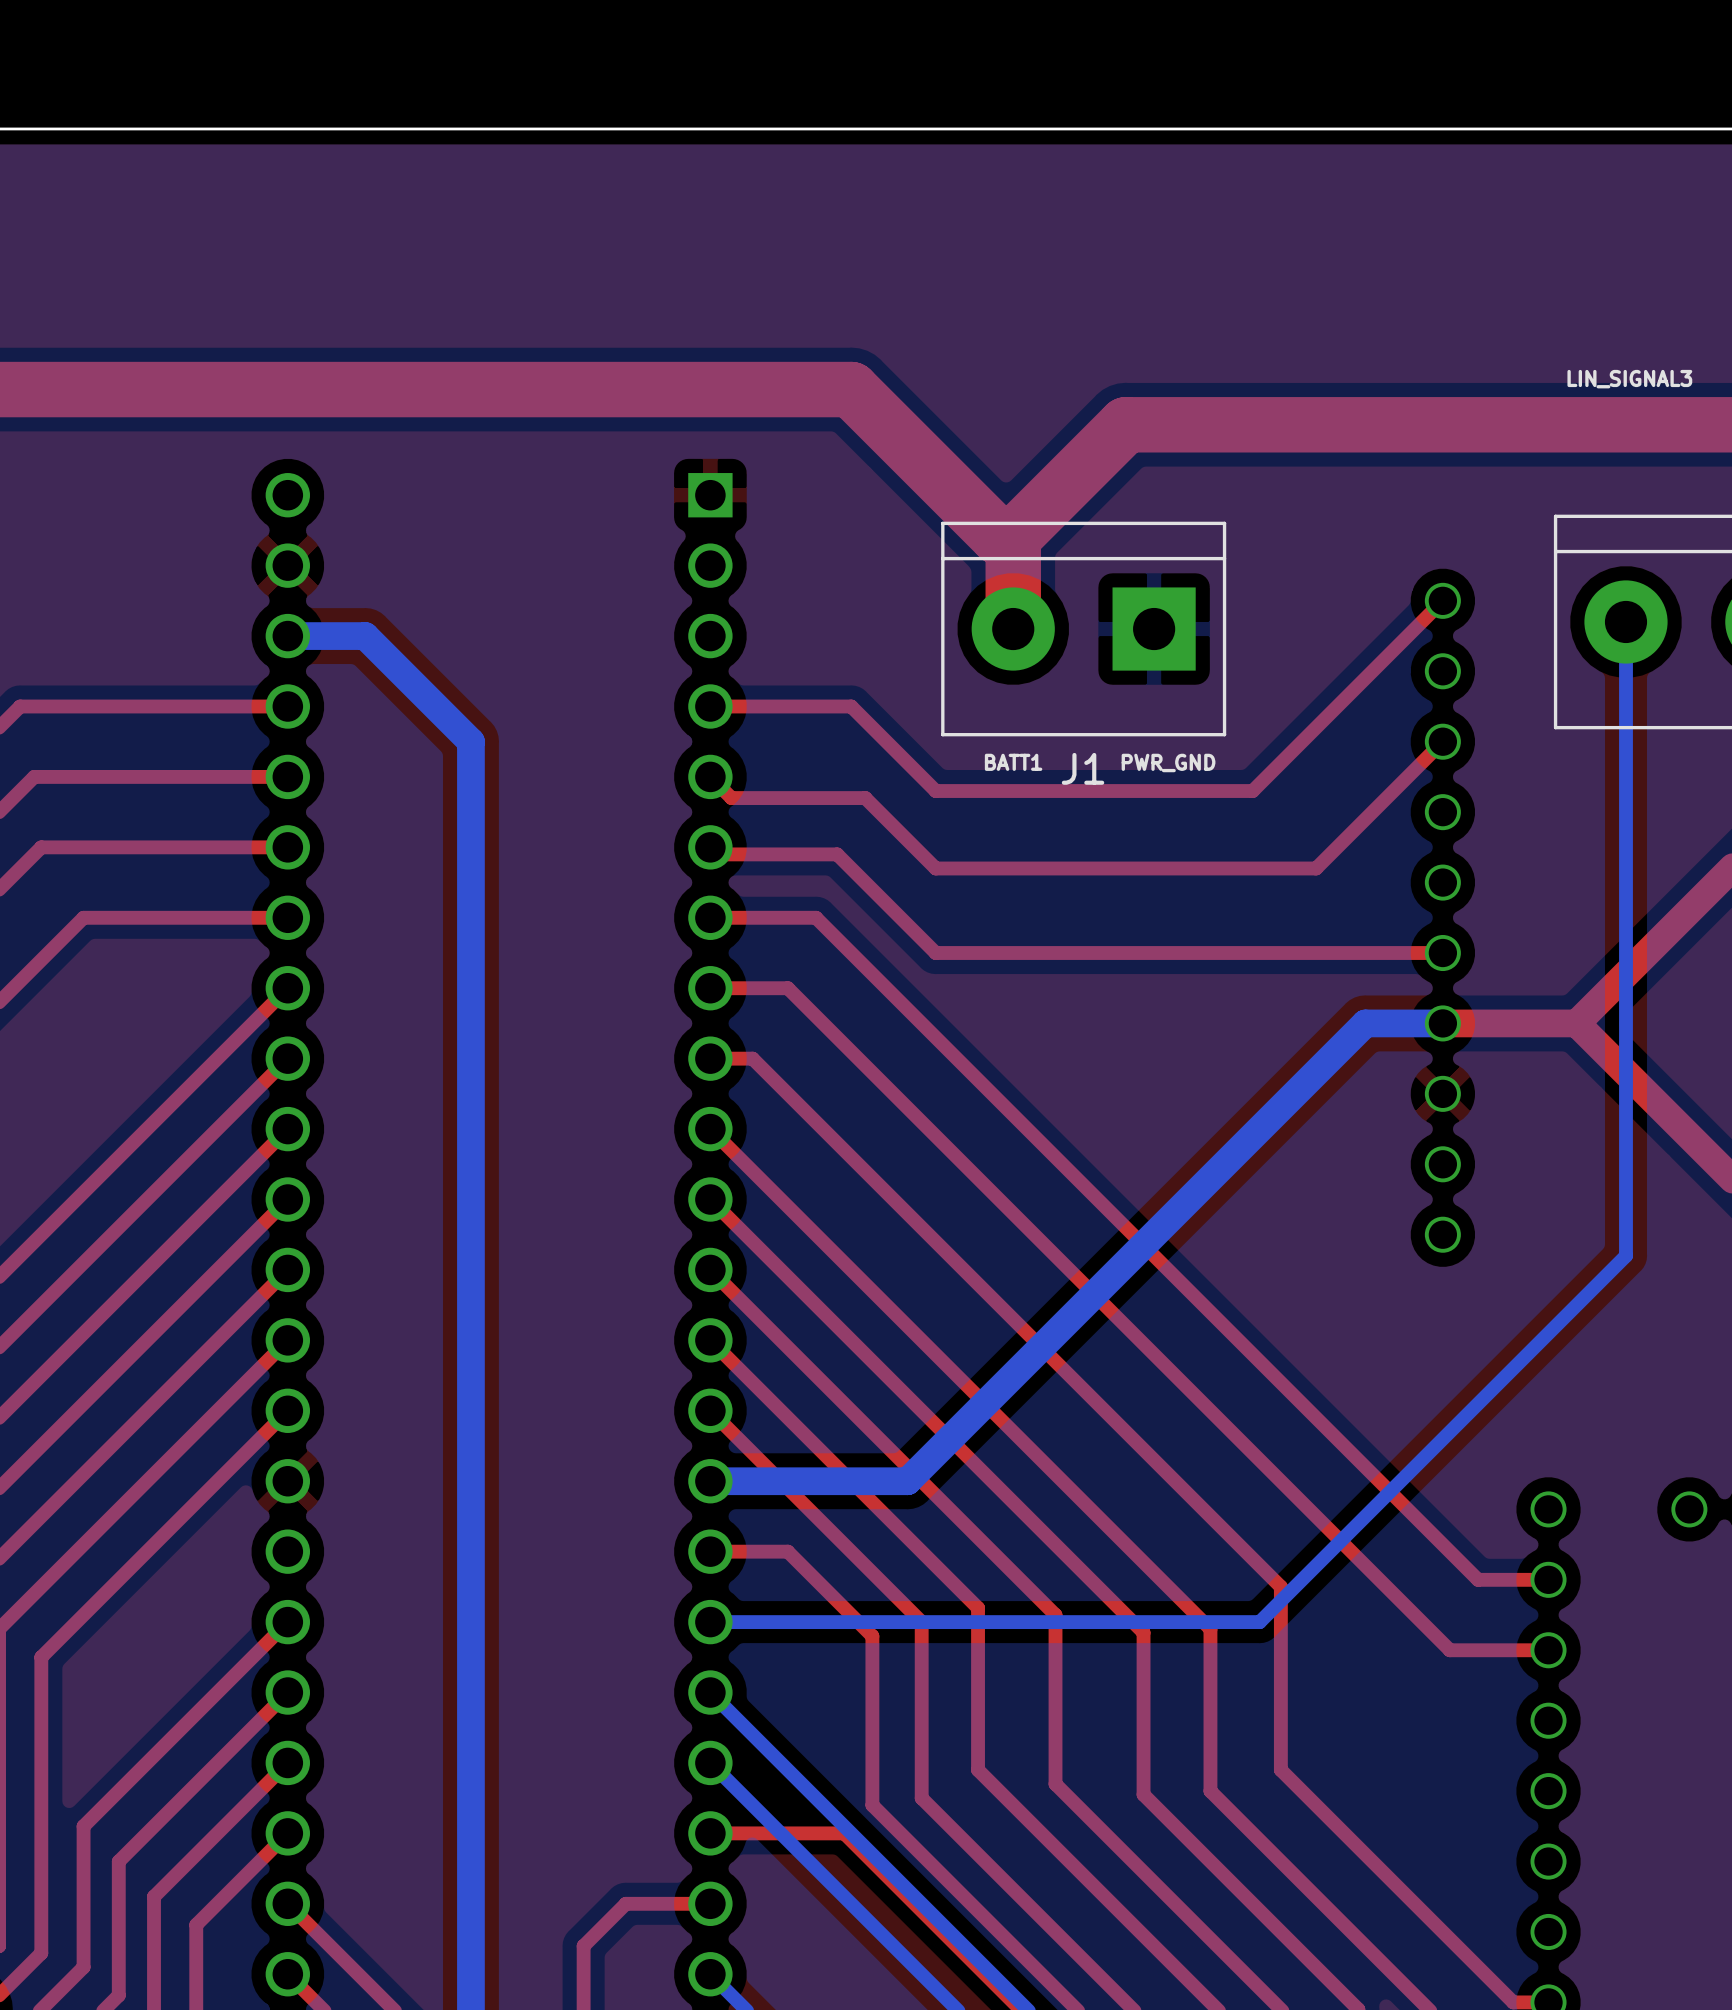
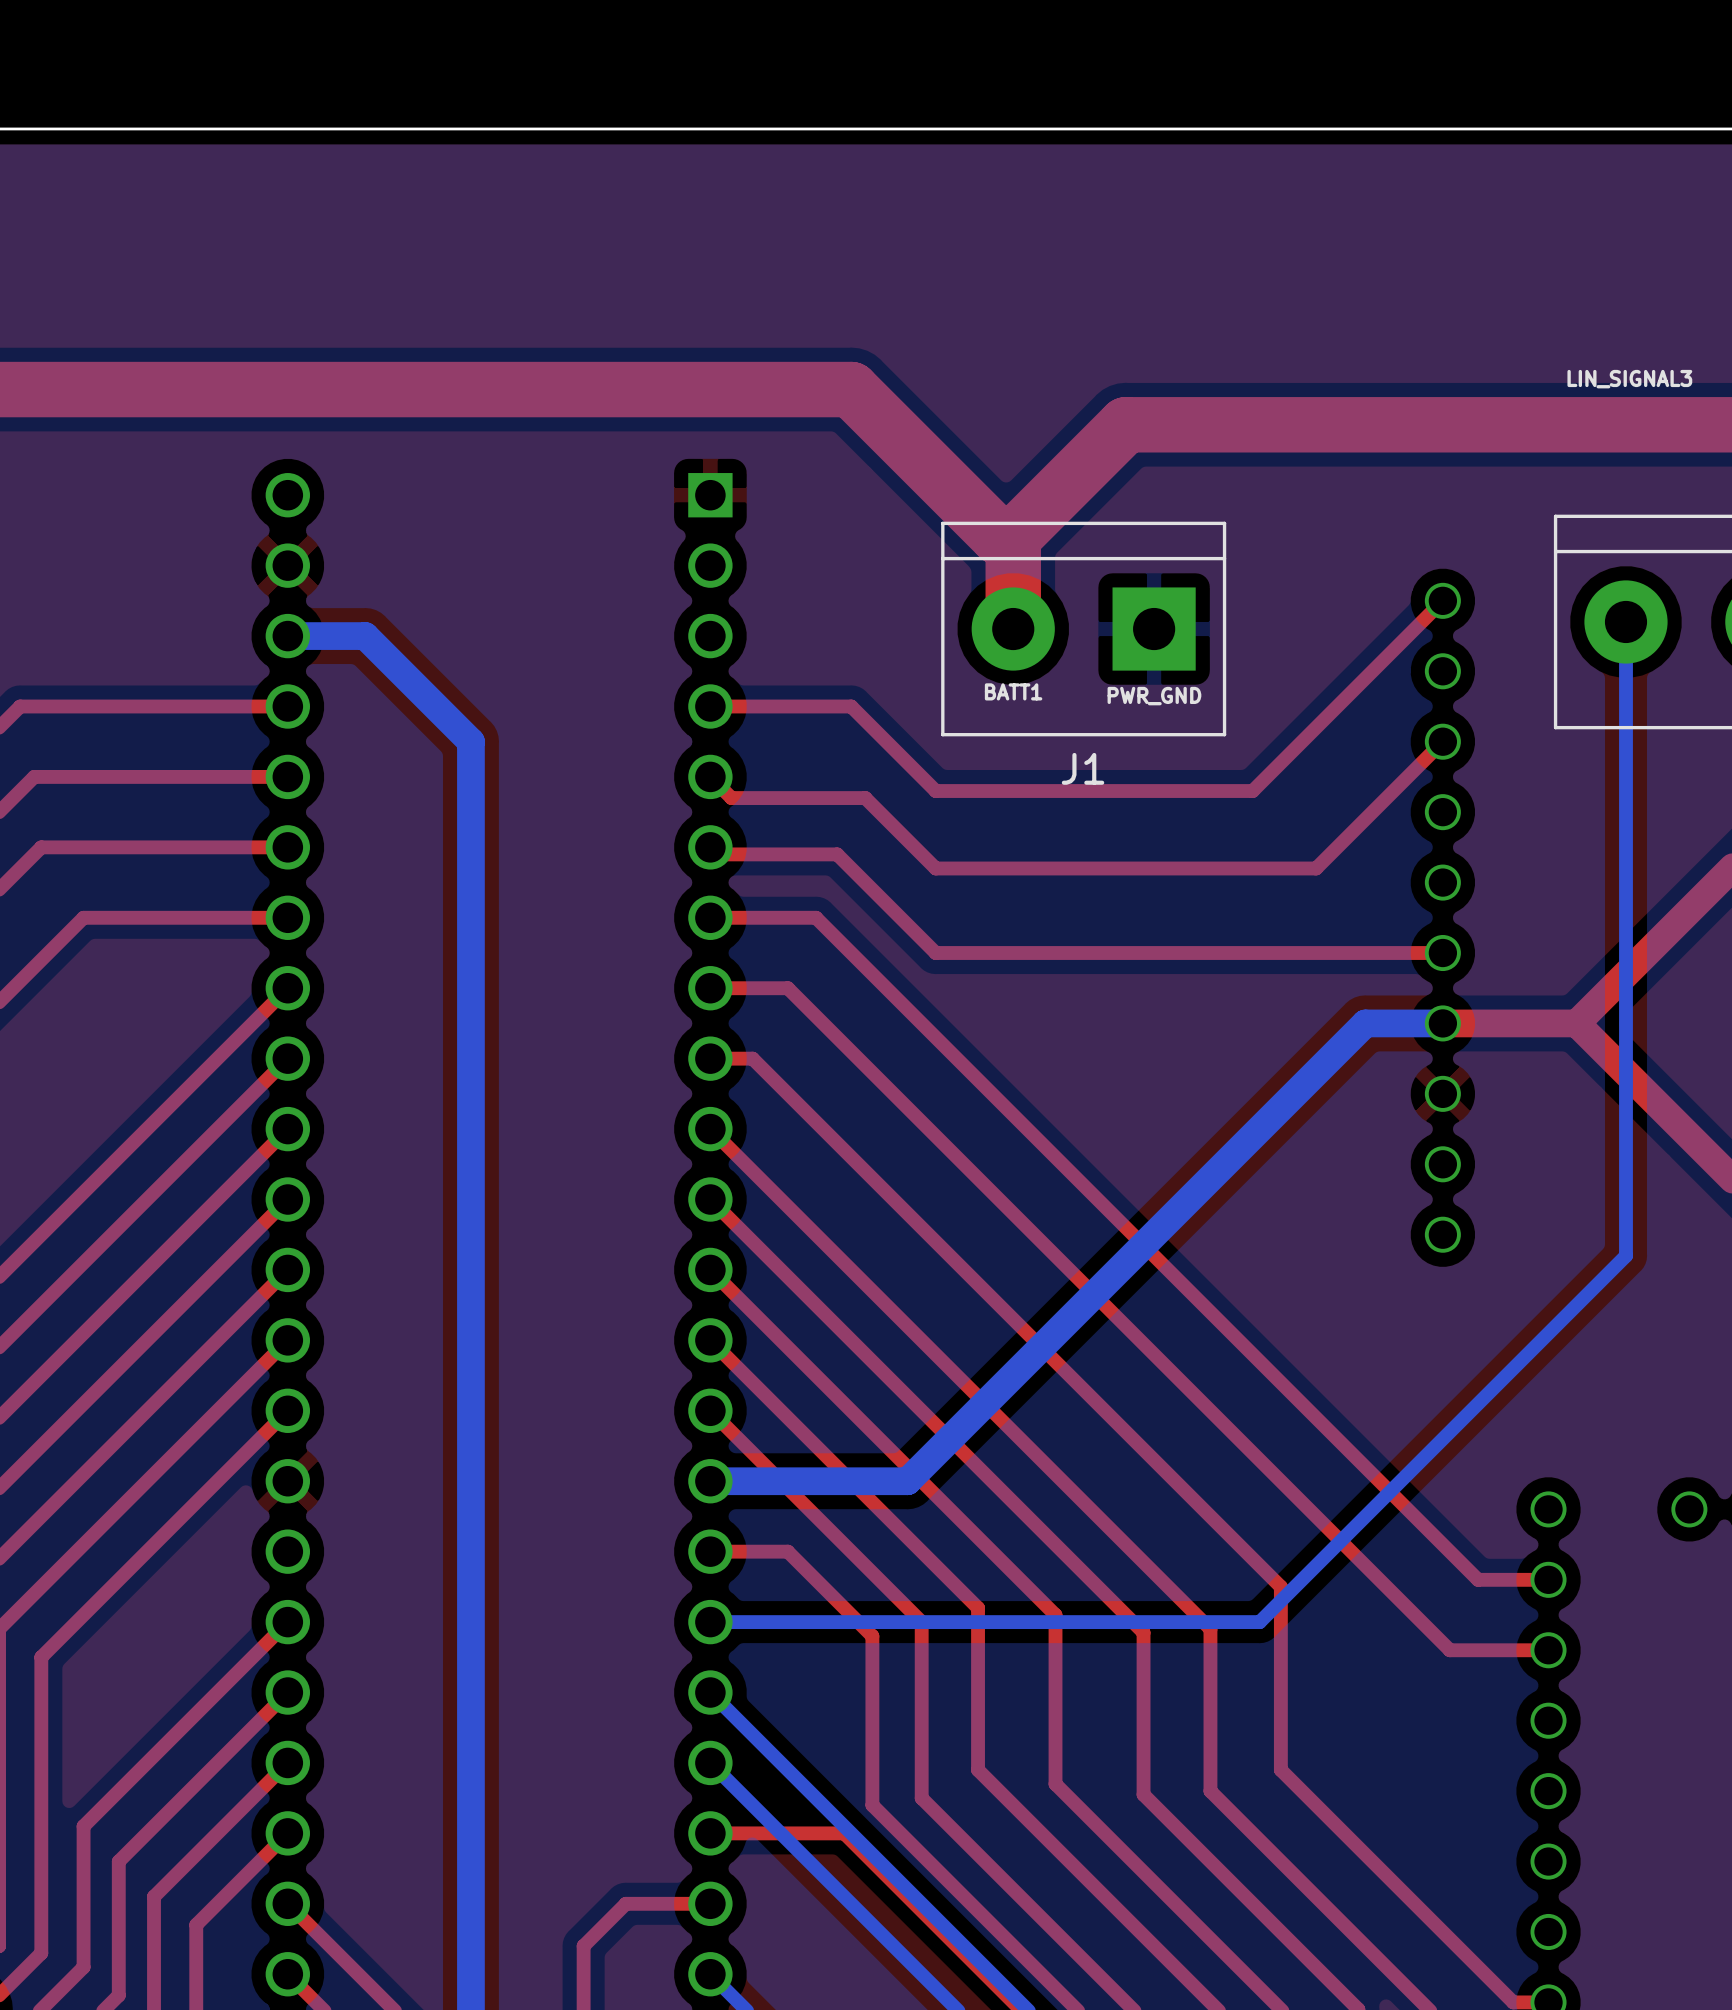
text position: BATT1 (1013, 762) -> BATT1 (1013, 691)
text position: PWR_GND (1168, 762) -> PWR_GND (1154, 696)

